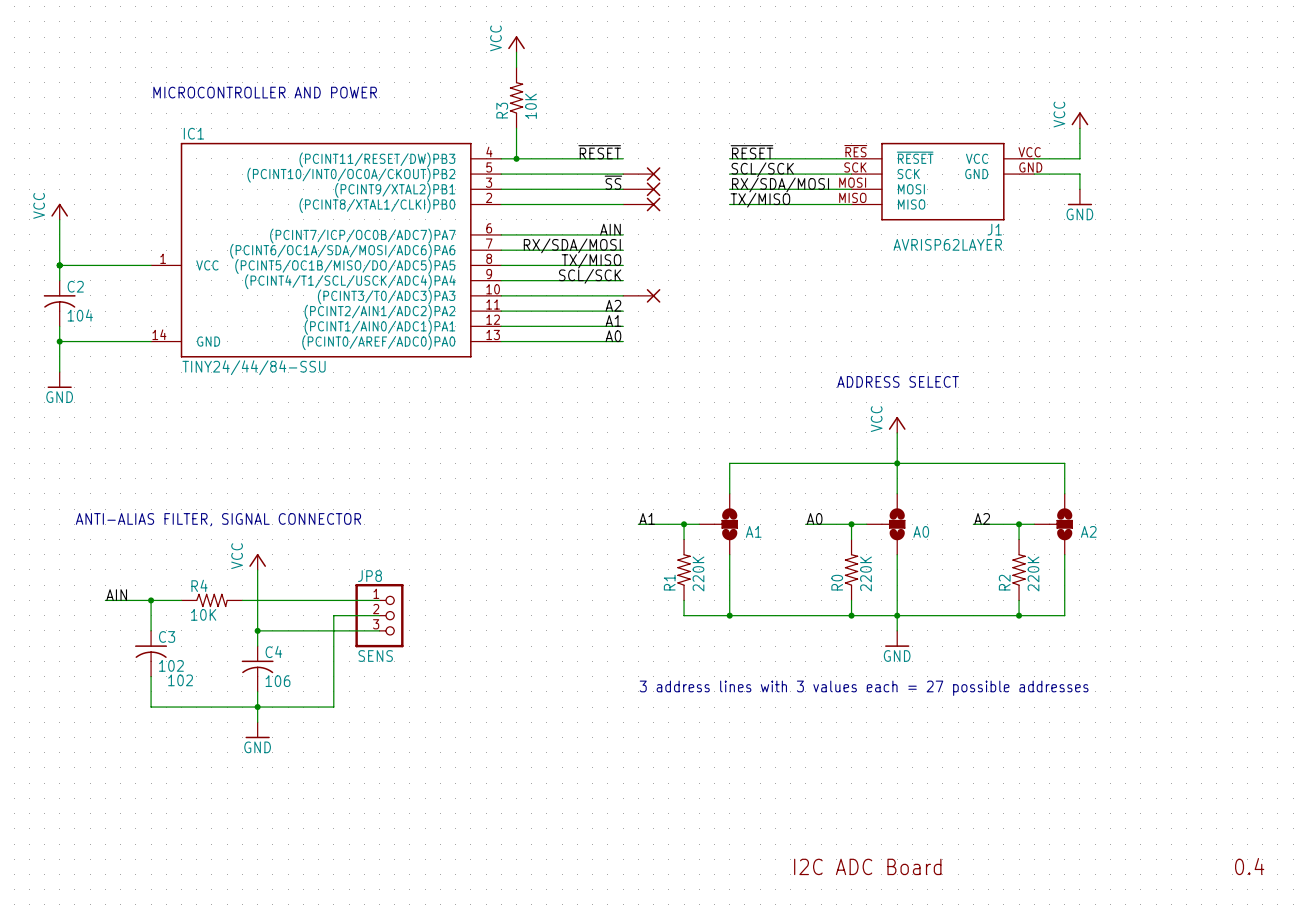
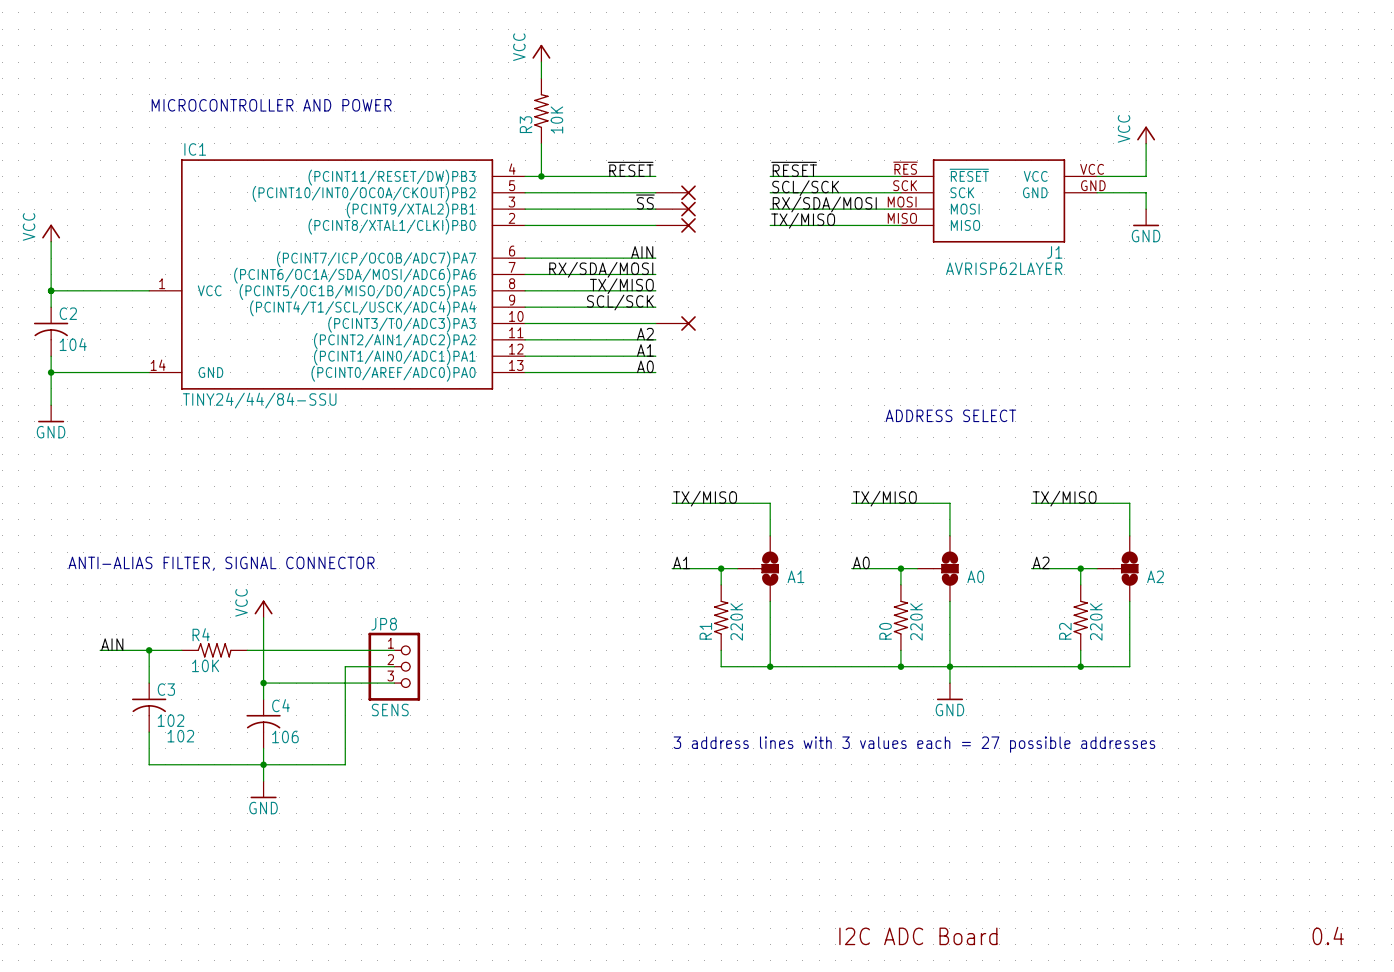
power symbol: VCC (897, 424) -> none
wire: (897, 432) (897, 463) (973, 463) -> none
label: none -> TX/MISO (705, 498)
label: none -> TX/MISO (884, 498)
label: none -> TX/MISO (1064, 498)
wire: (729, 463) (805, 463) -> (770, 503) (672, 503)
junction: (897, 463) -> none

